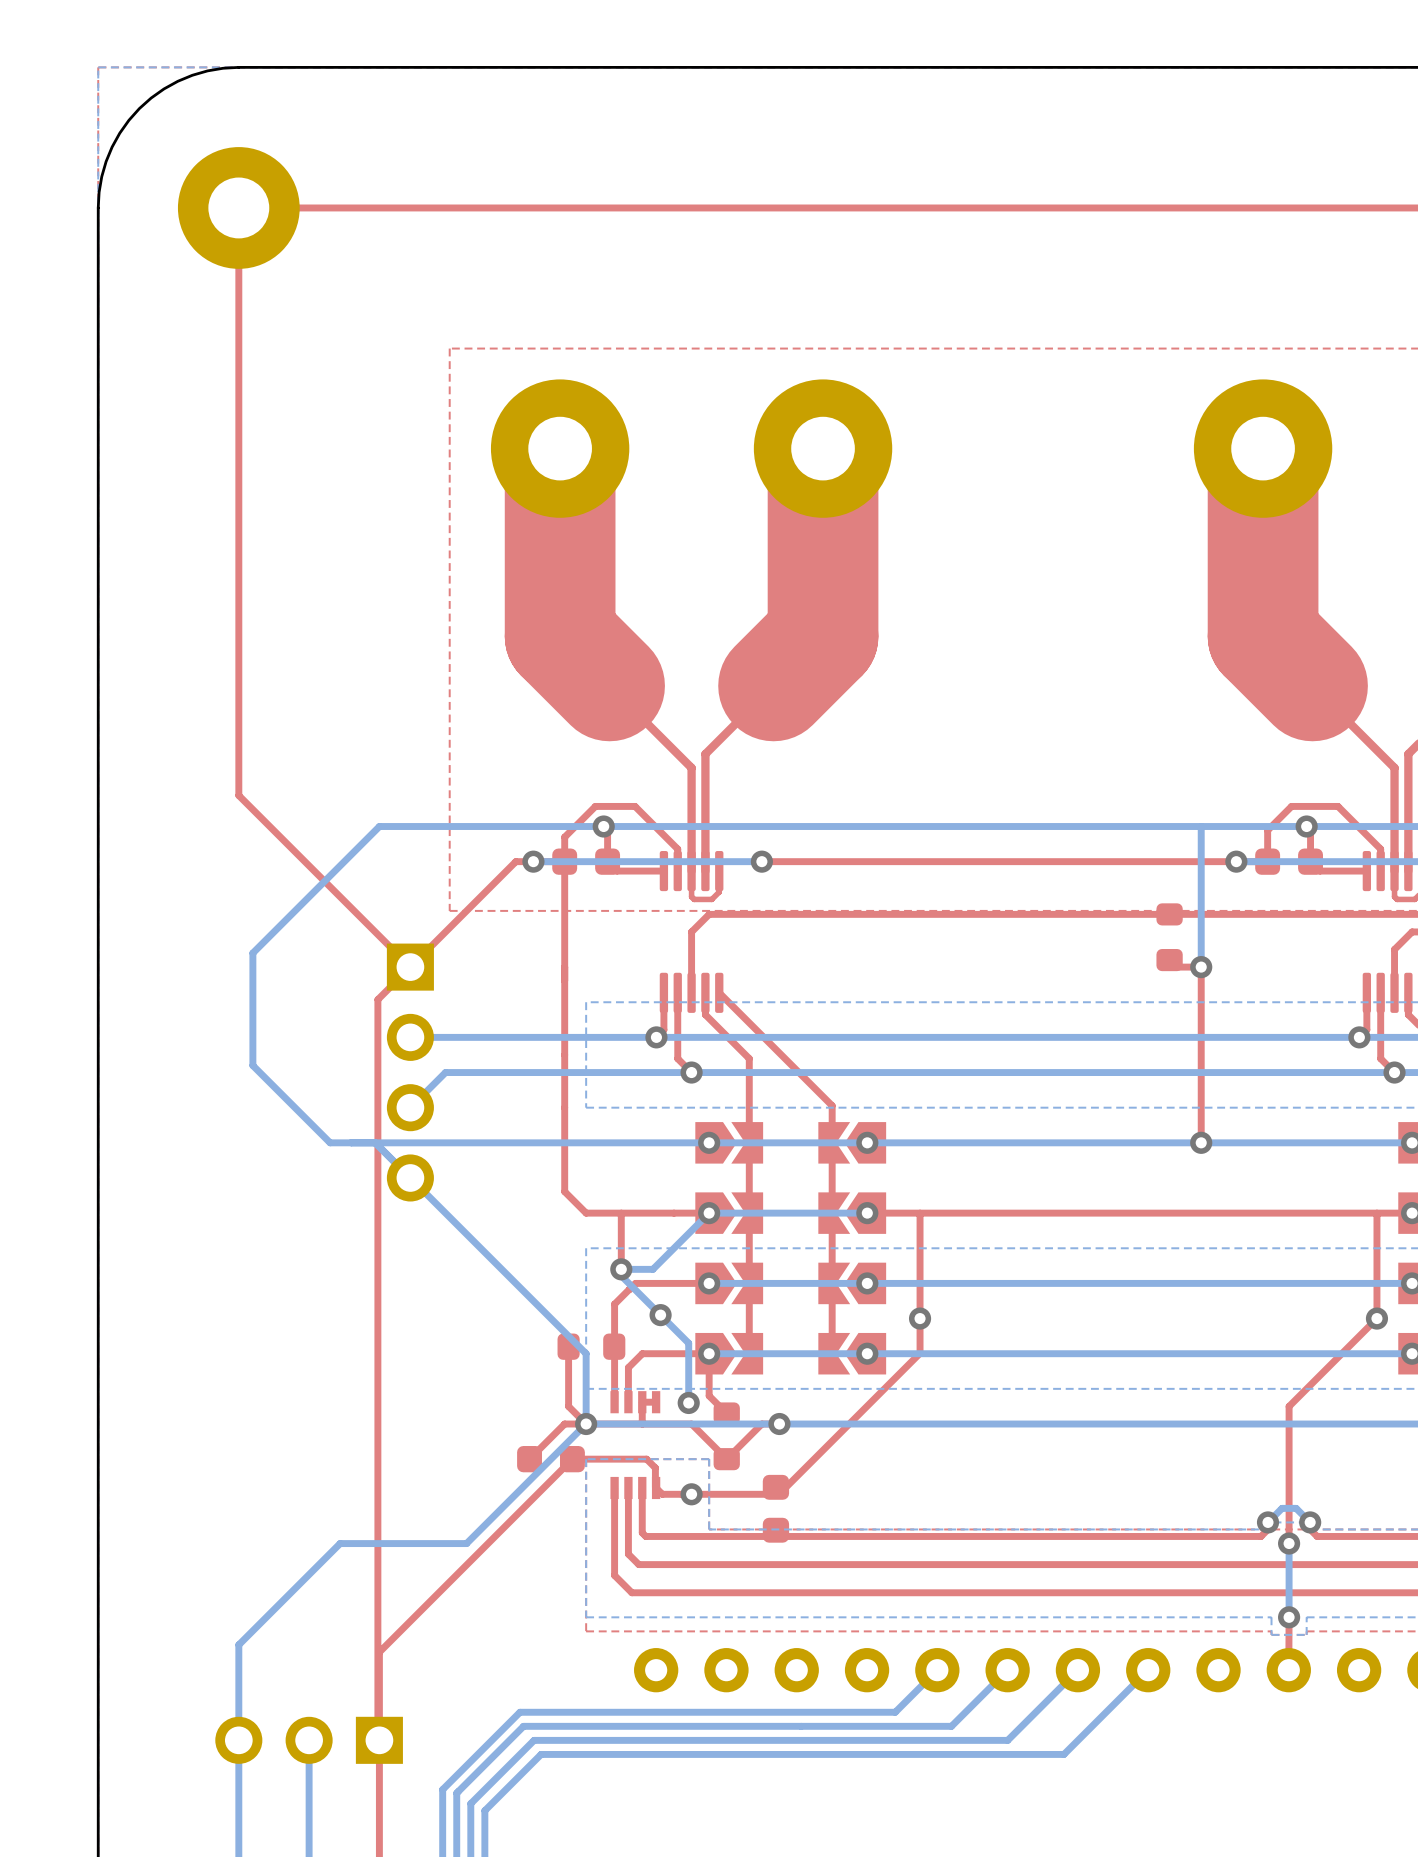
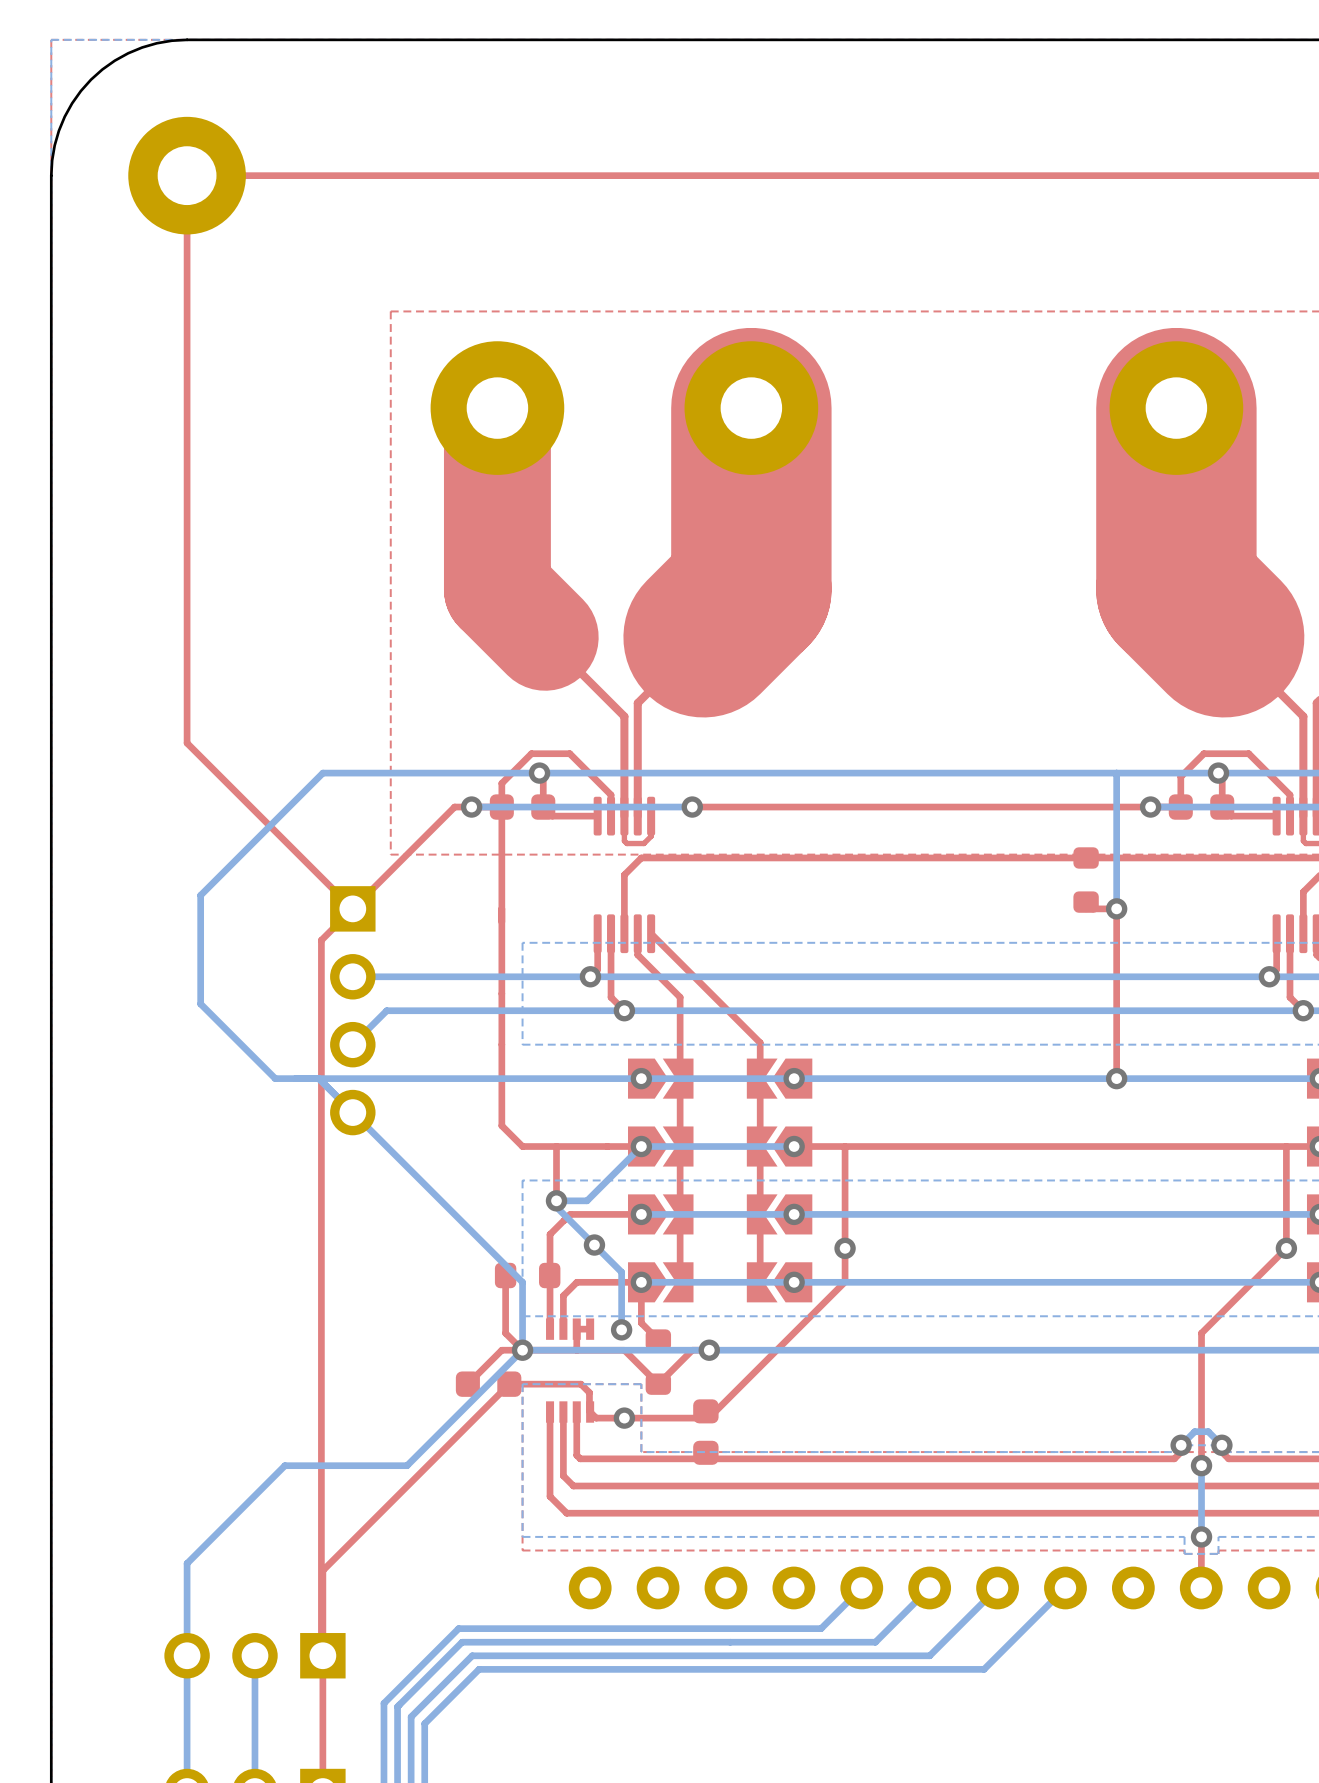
top track width: thin (823, 448) (823, 636) (773, 685) -> thick (751, 408) (751, 589) (703, 637)
top track width: thin (1263, 448) (1263, 636) (1312, 685) -> thick (1176, 408) (1176, 589) (1224, 637)

